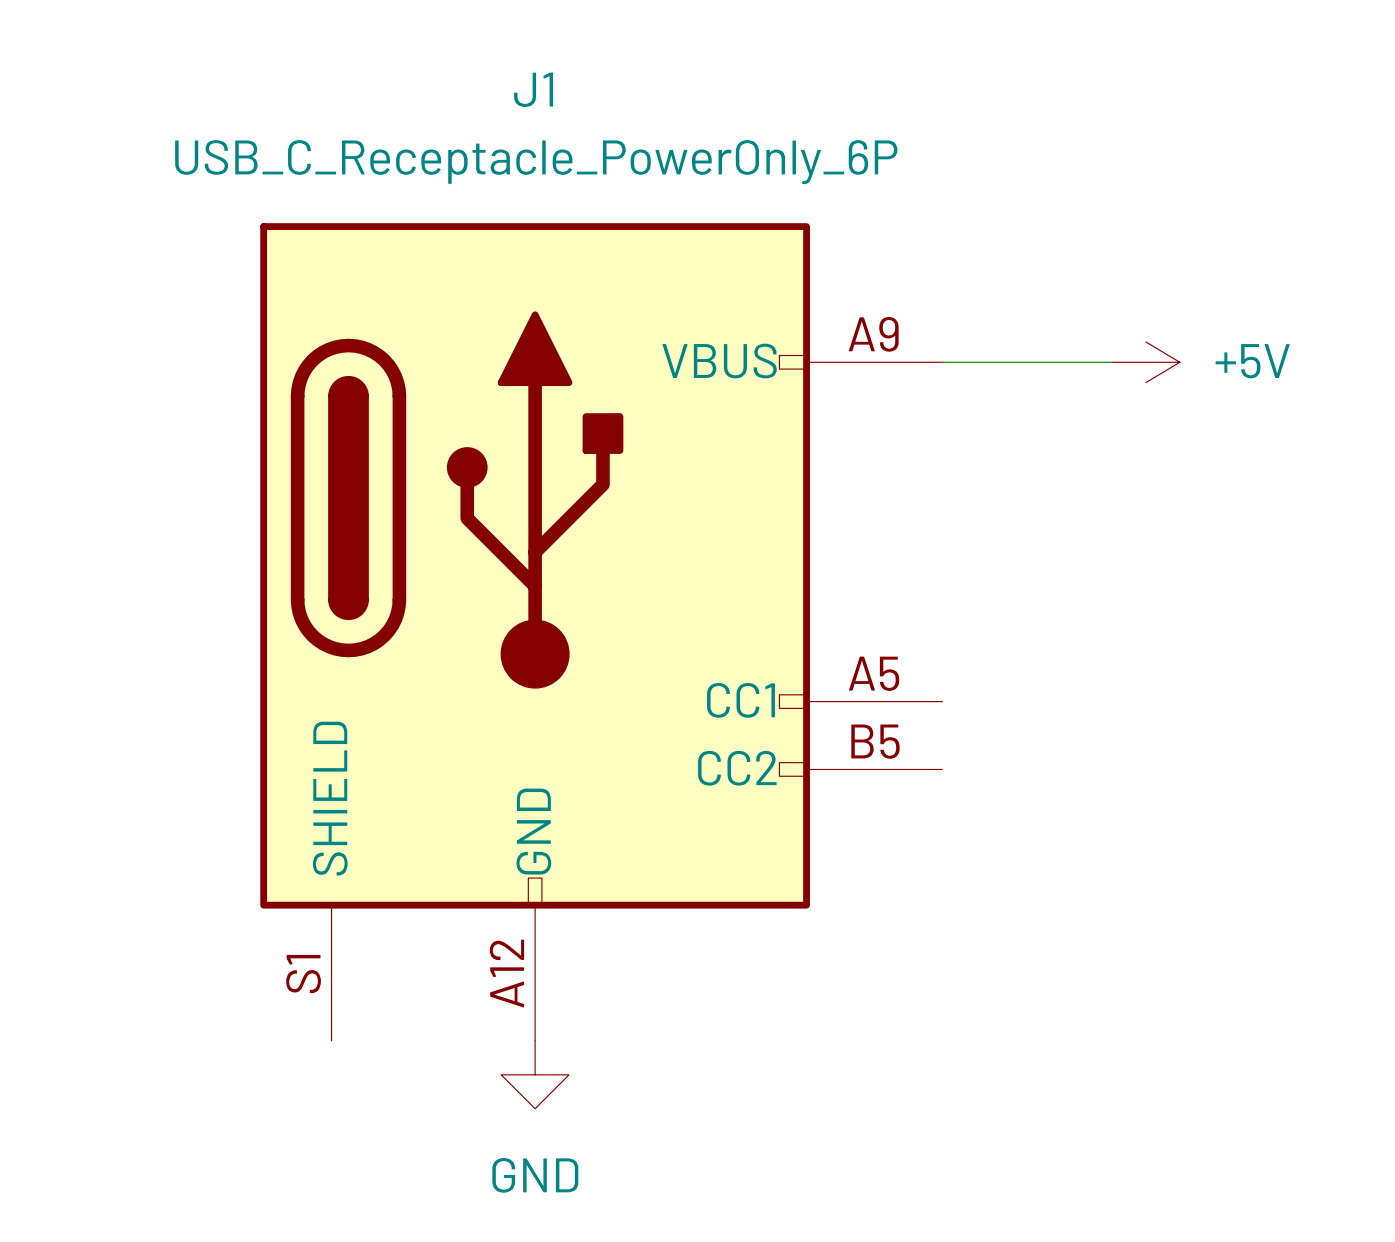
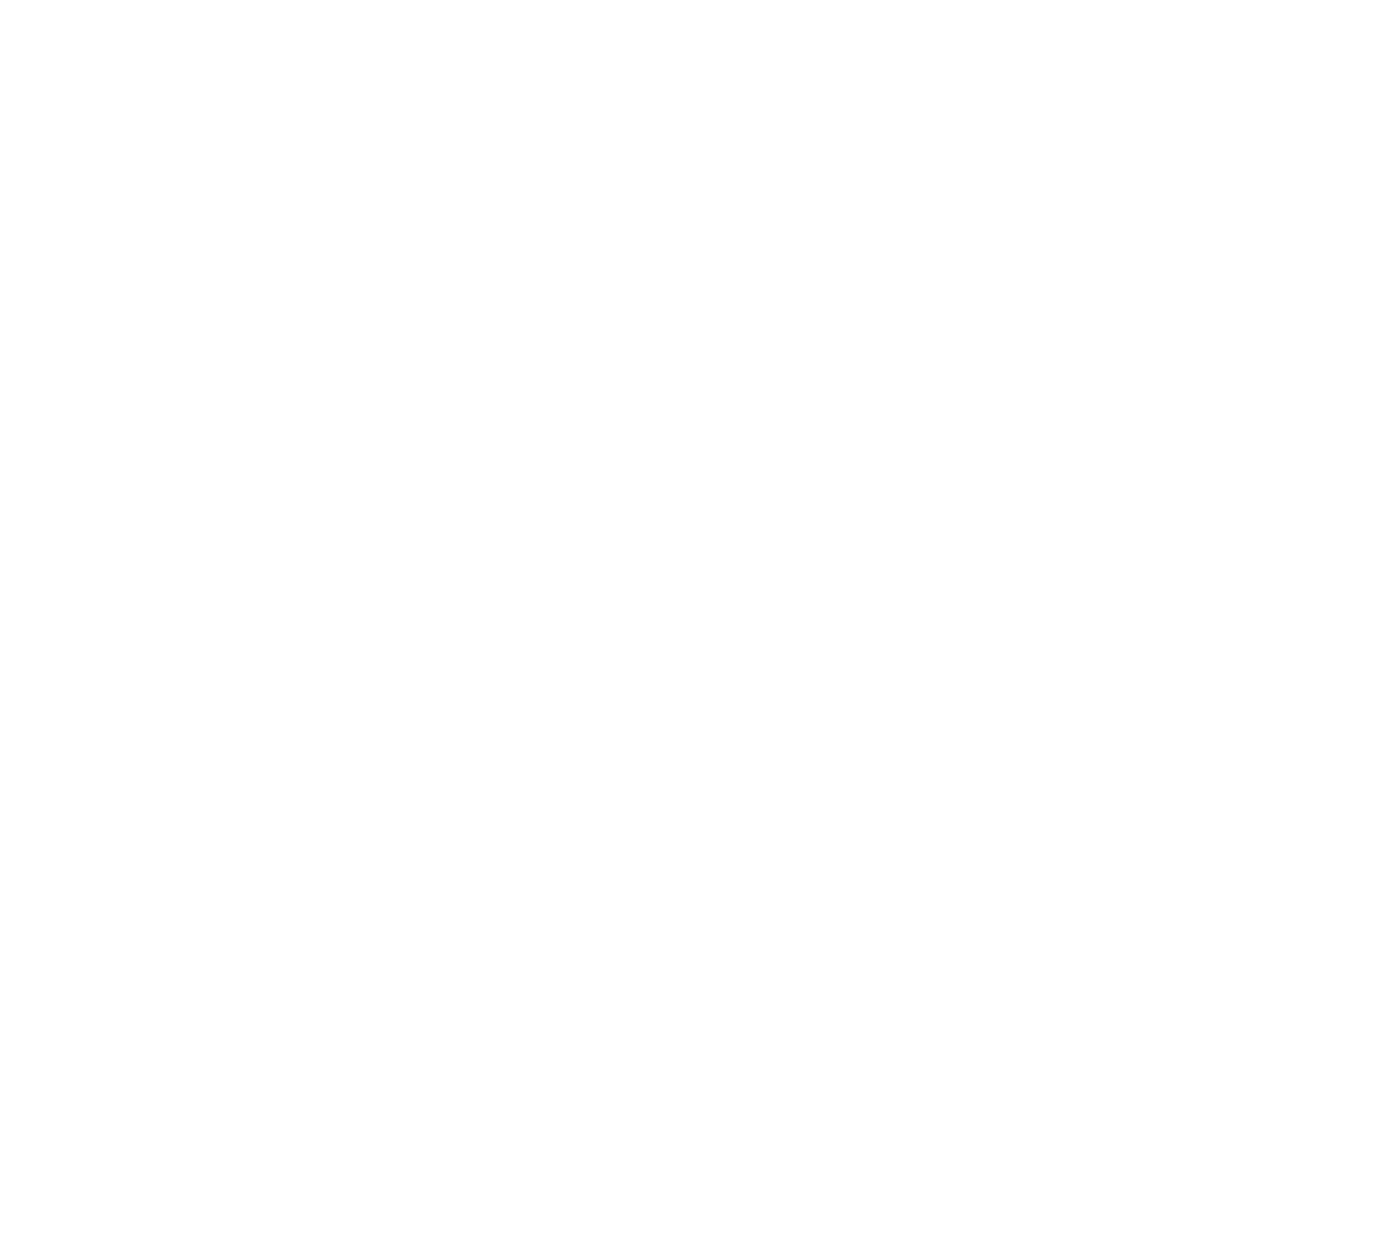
wire: (942, 362) (1111, 362) -> none
power symbol: +5V (1145, 362) -> none
J1: USB_C_Receptacle_PowerOnly_6P (601, 632) -> none
power symbol: GND (535, 1074) -> none

